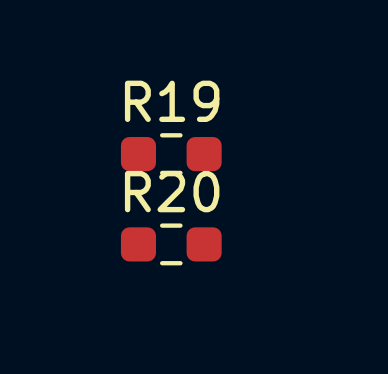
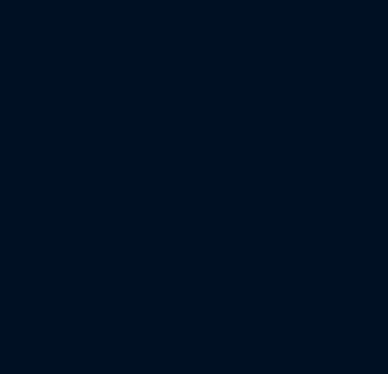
R19: (171, 154) -> none
R20: (171, 244) -> none

